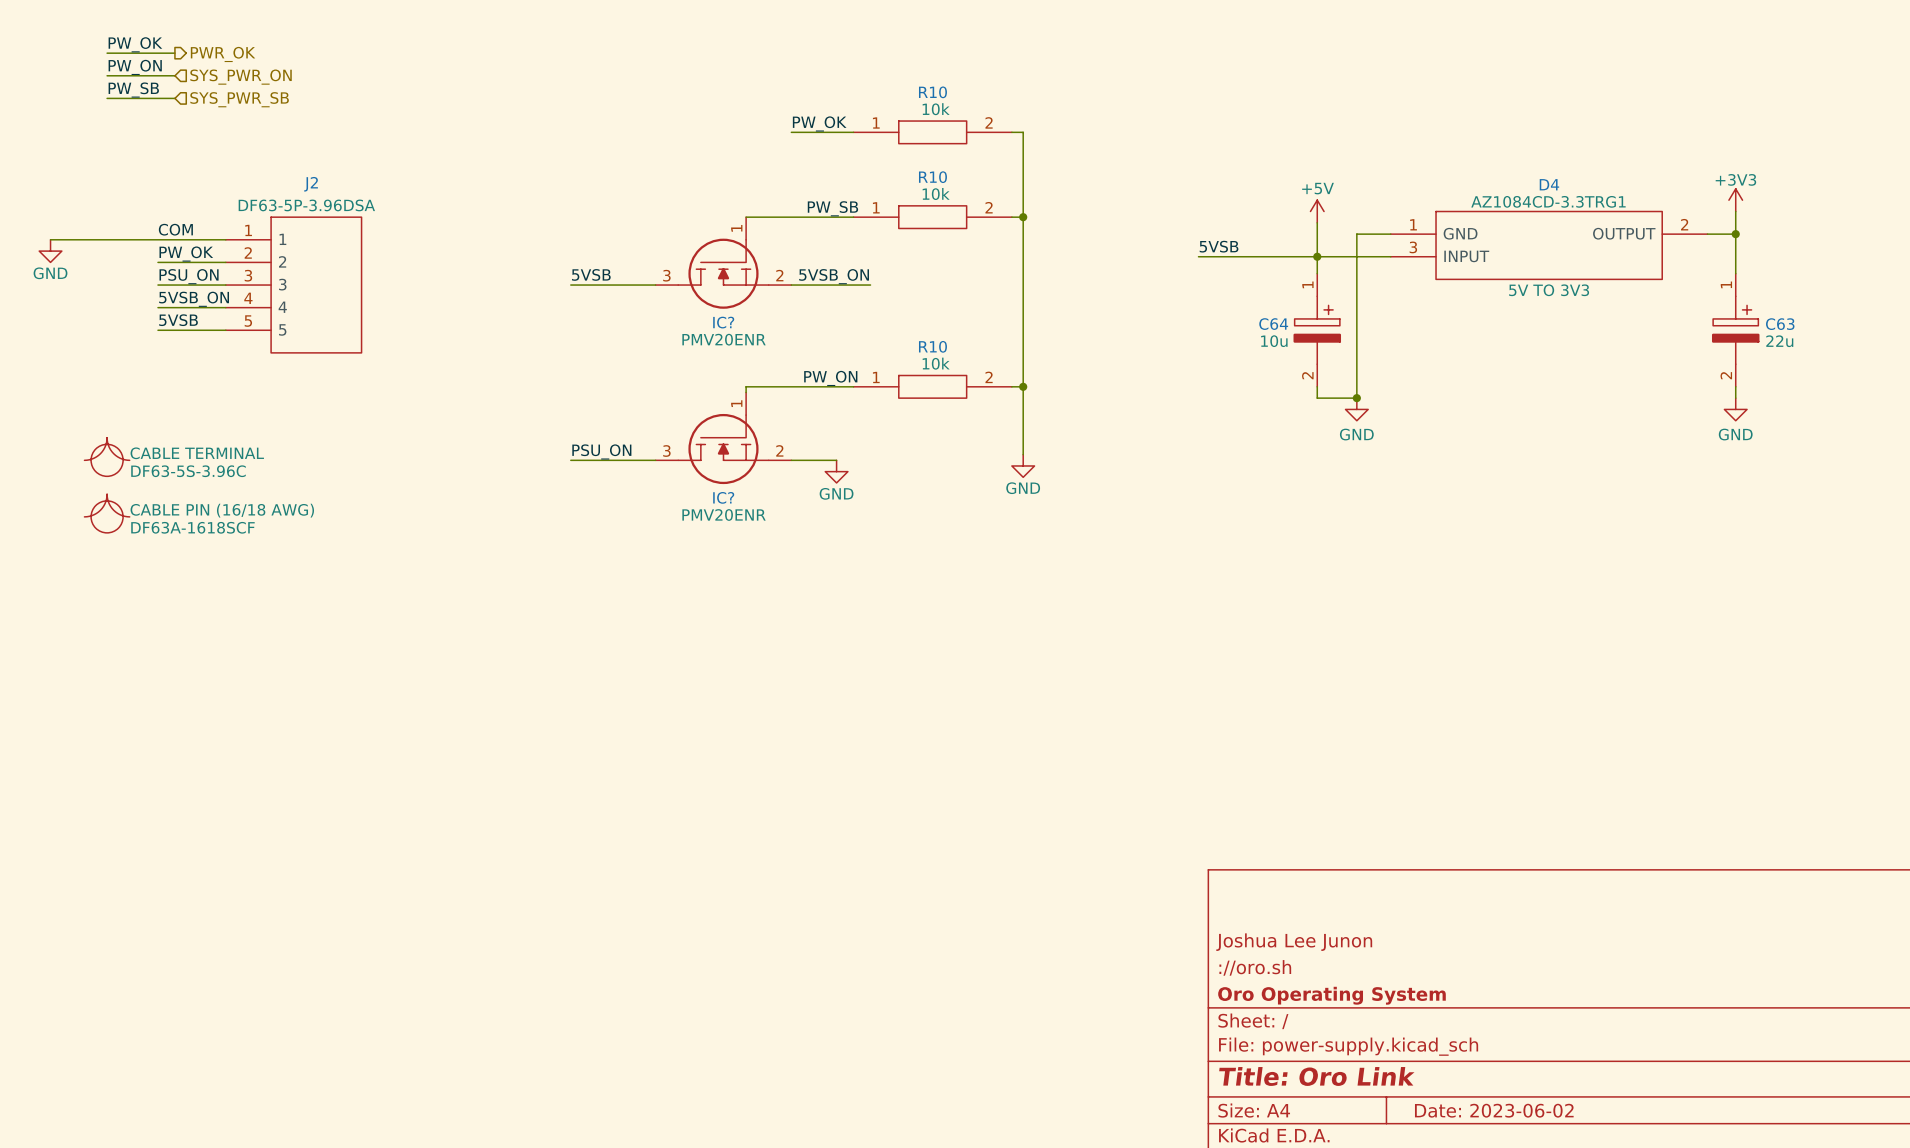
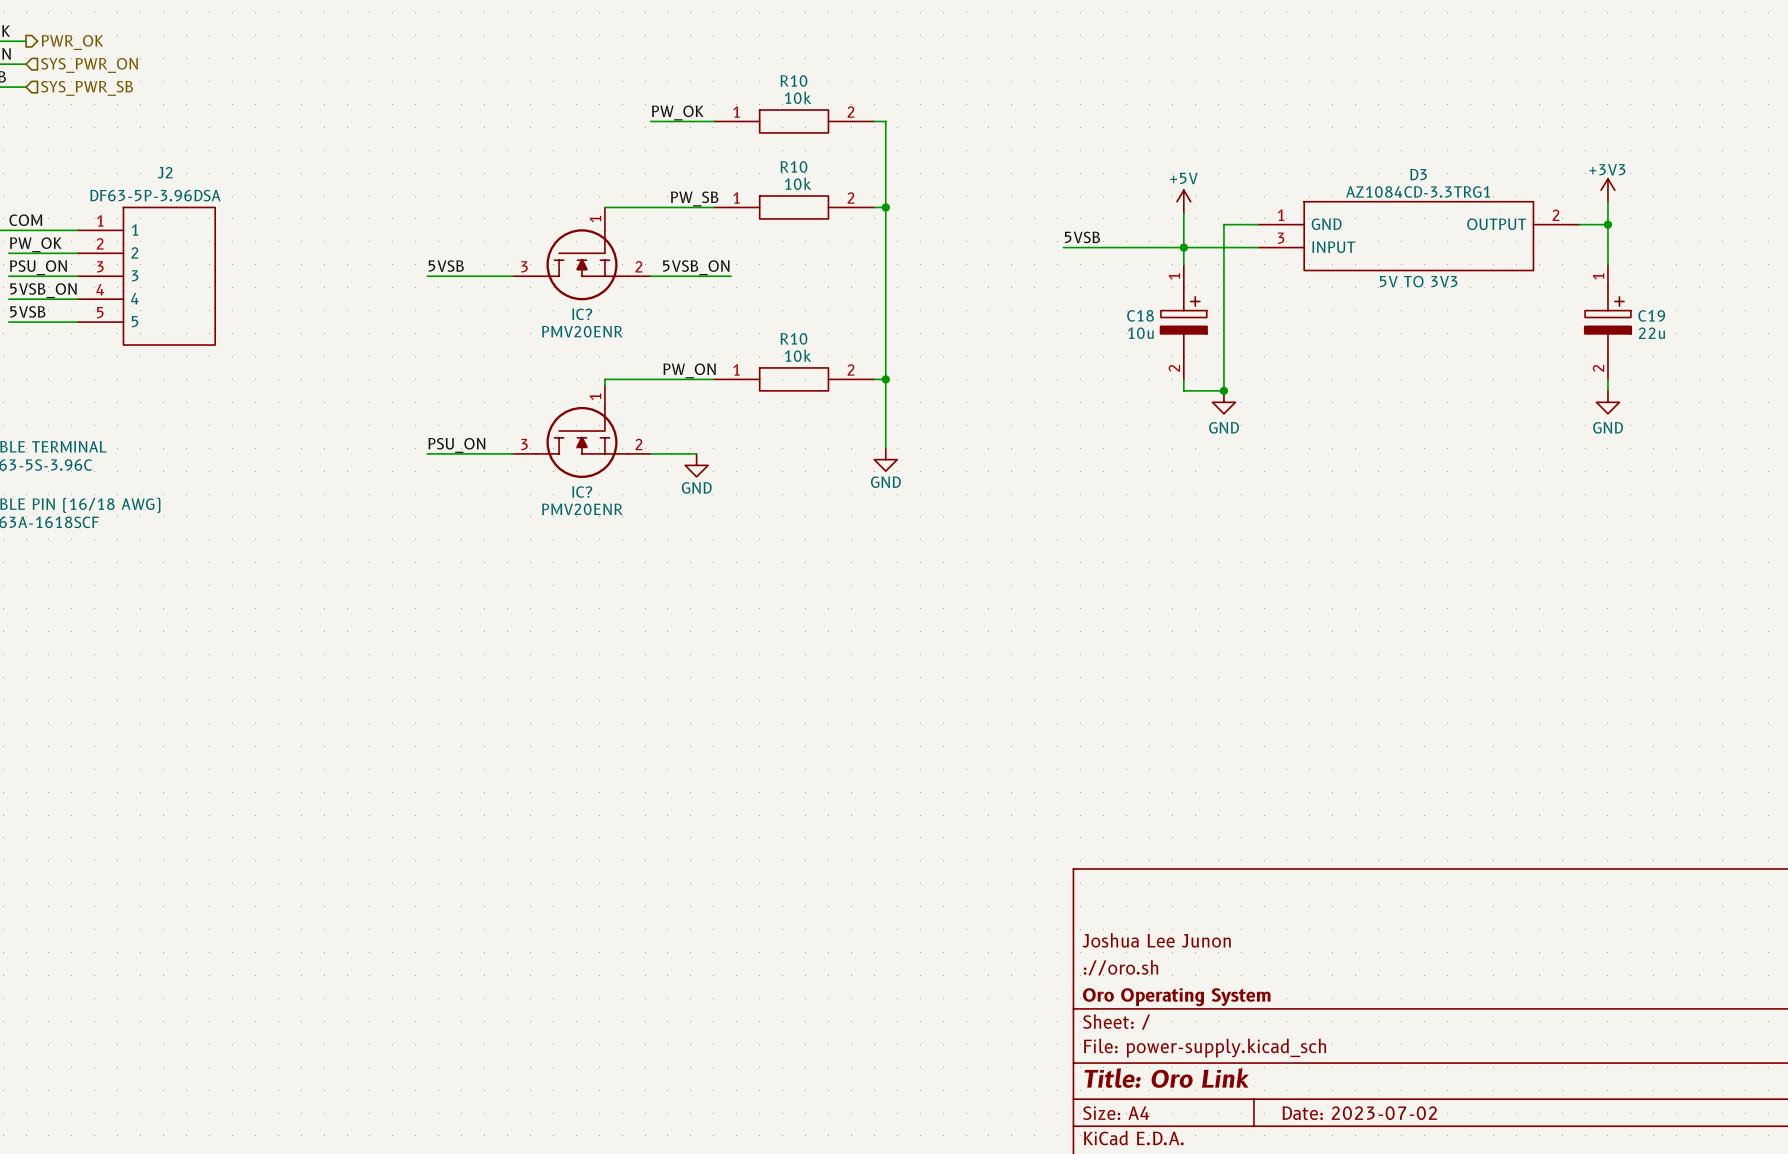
D4 name: D4 (1549, 184) -> D3 (1418, 174)
C64 name: C64 (1273, 324) -> C18 (1140, 315)
C63 name: C63 (1780, 324) -> C19 (1651, 315)
title block: Date: 2023-06-02 (1494, 1110) -> Date: 2023-07-02 (1359, 1113)

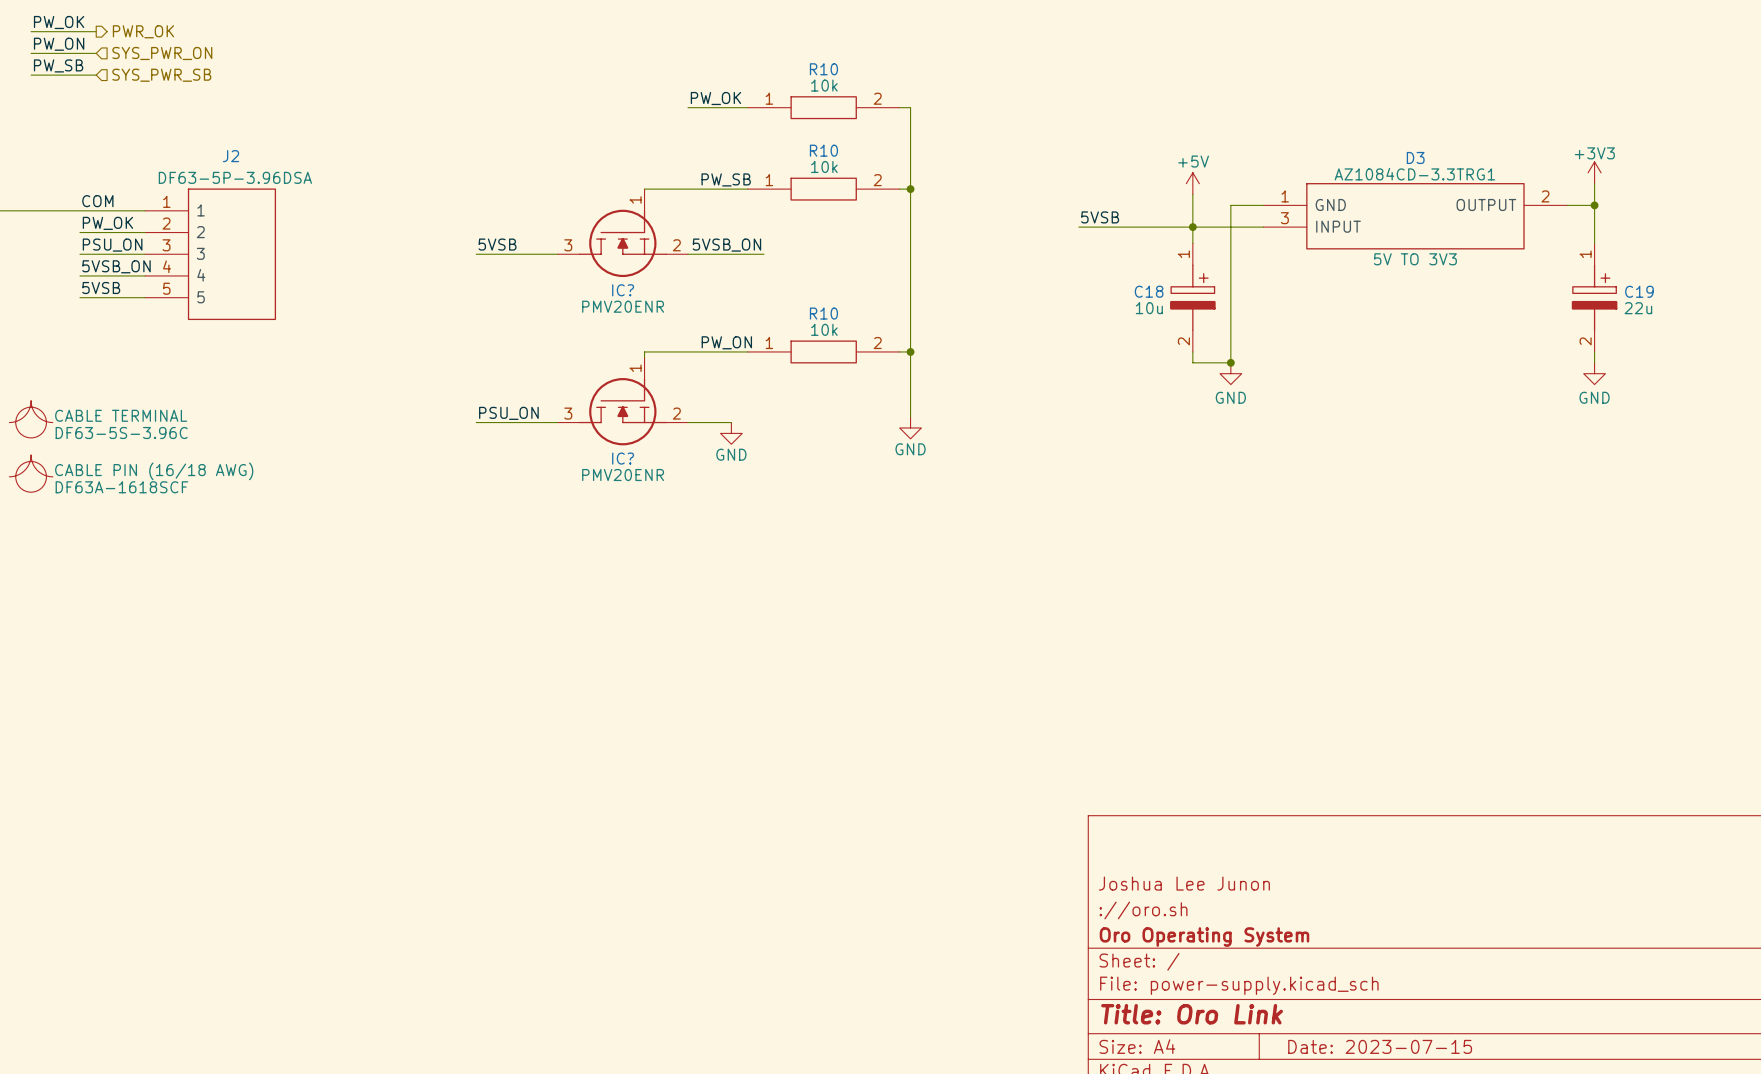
title block: Date: 2023-07-02 (1359, 1113) -> Date: 2023-07-15 (1380, 1046)

